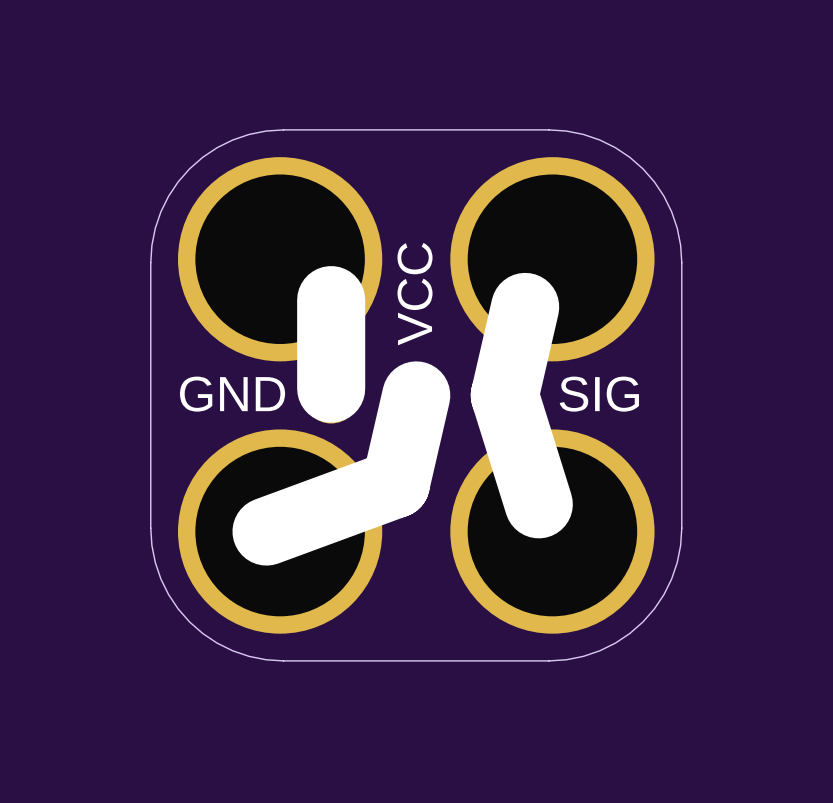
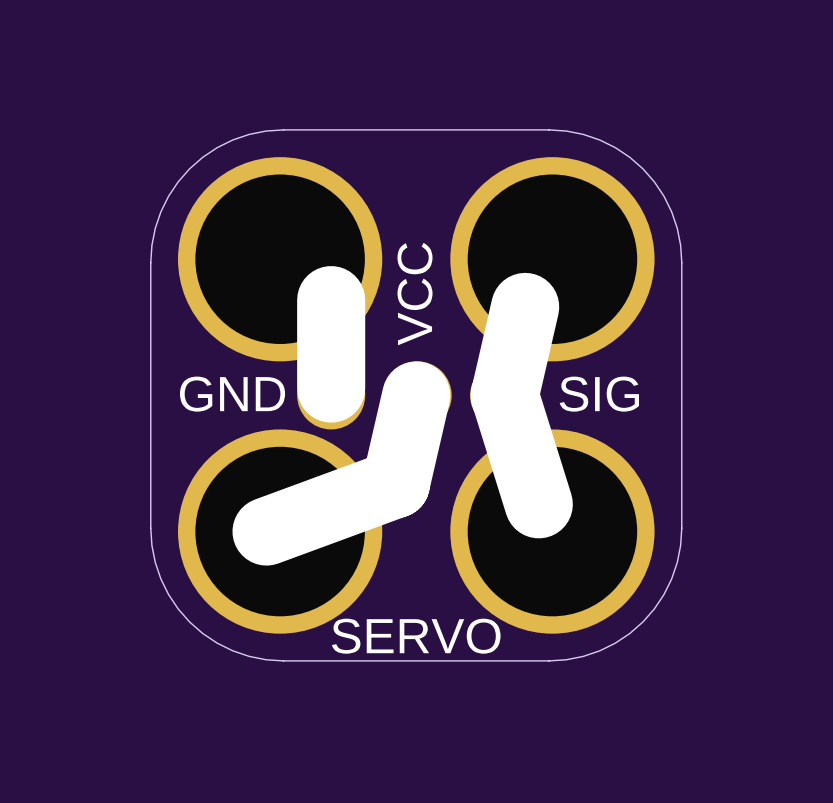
part footprint: [150, 129, 683, 662] -> [150, 129, 683, 662]

